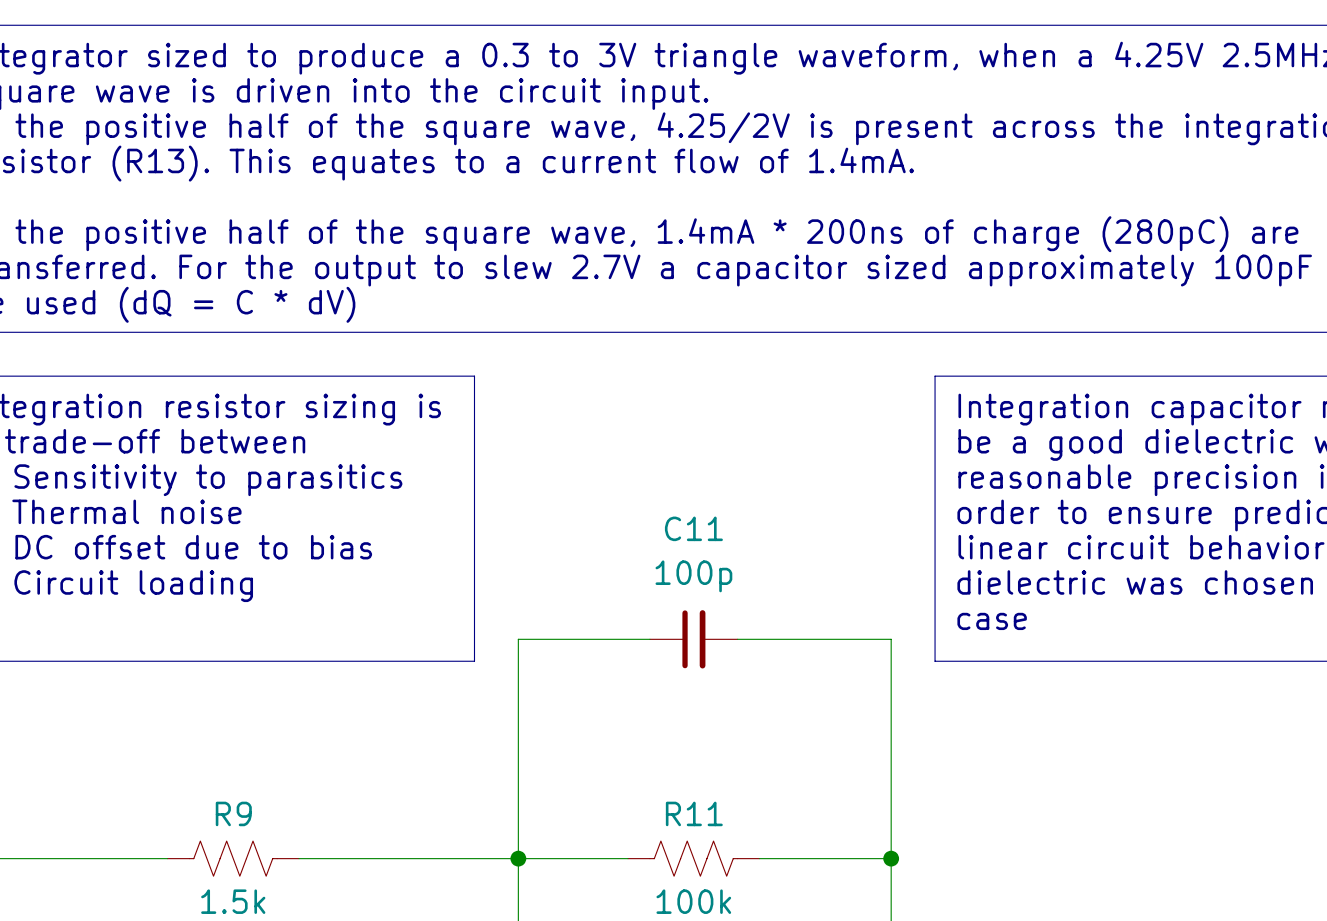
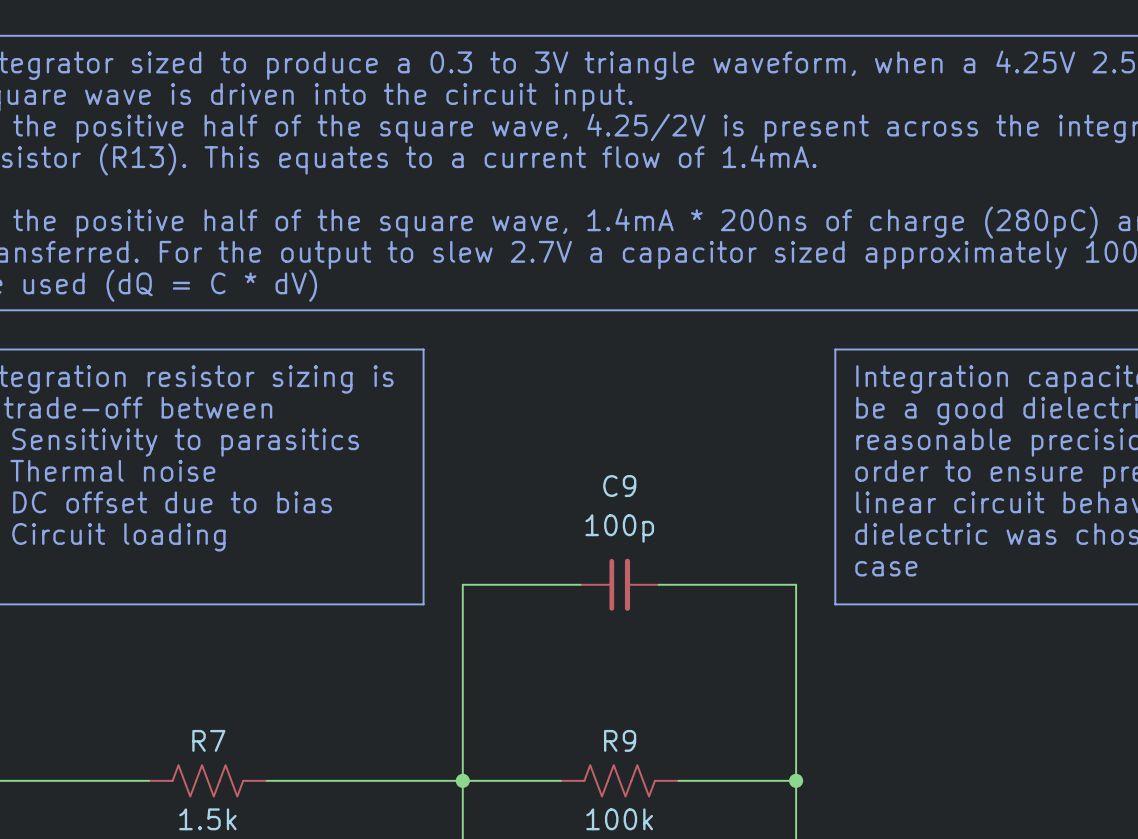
C11 name: C11 (693, 528) -> C9 (619, 486)
R9 name: R9 (233, 813) -> R7 (208, 740)
R11 name: R11 (694, 813) -> R9 (620, 740)

